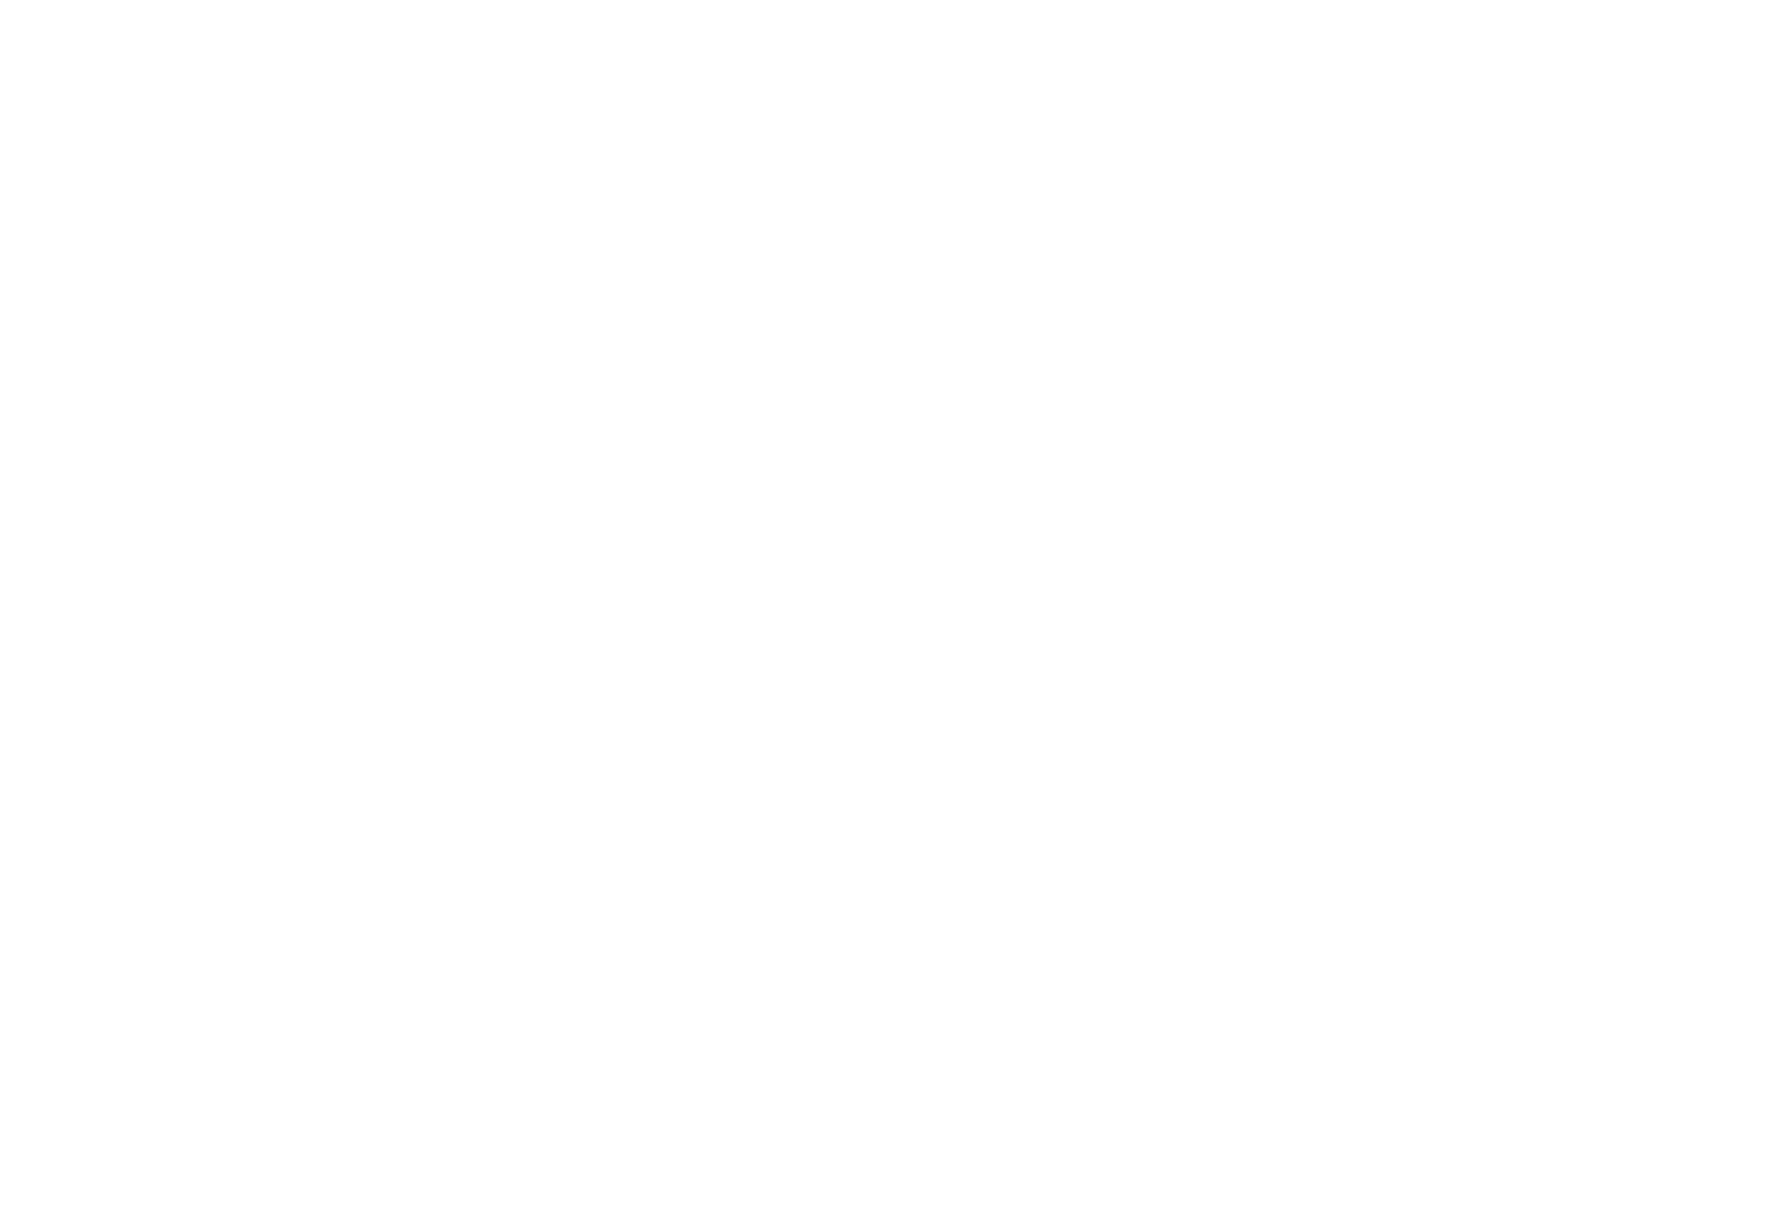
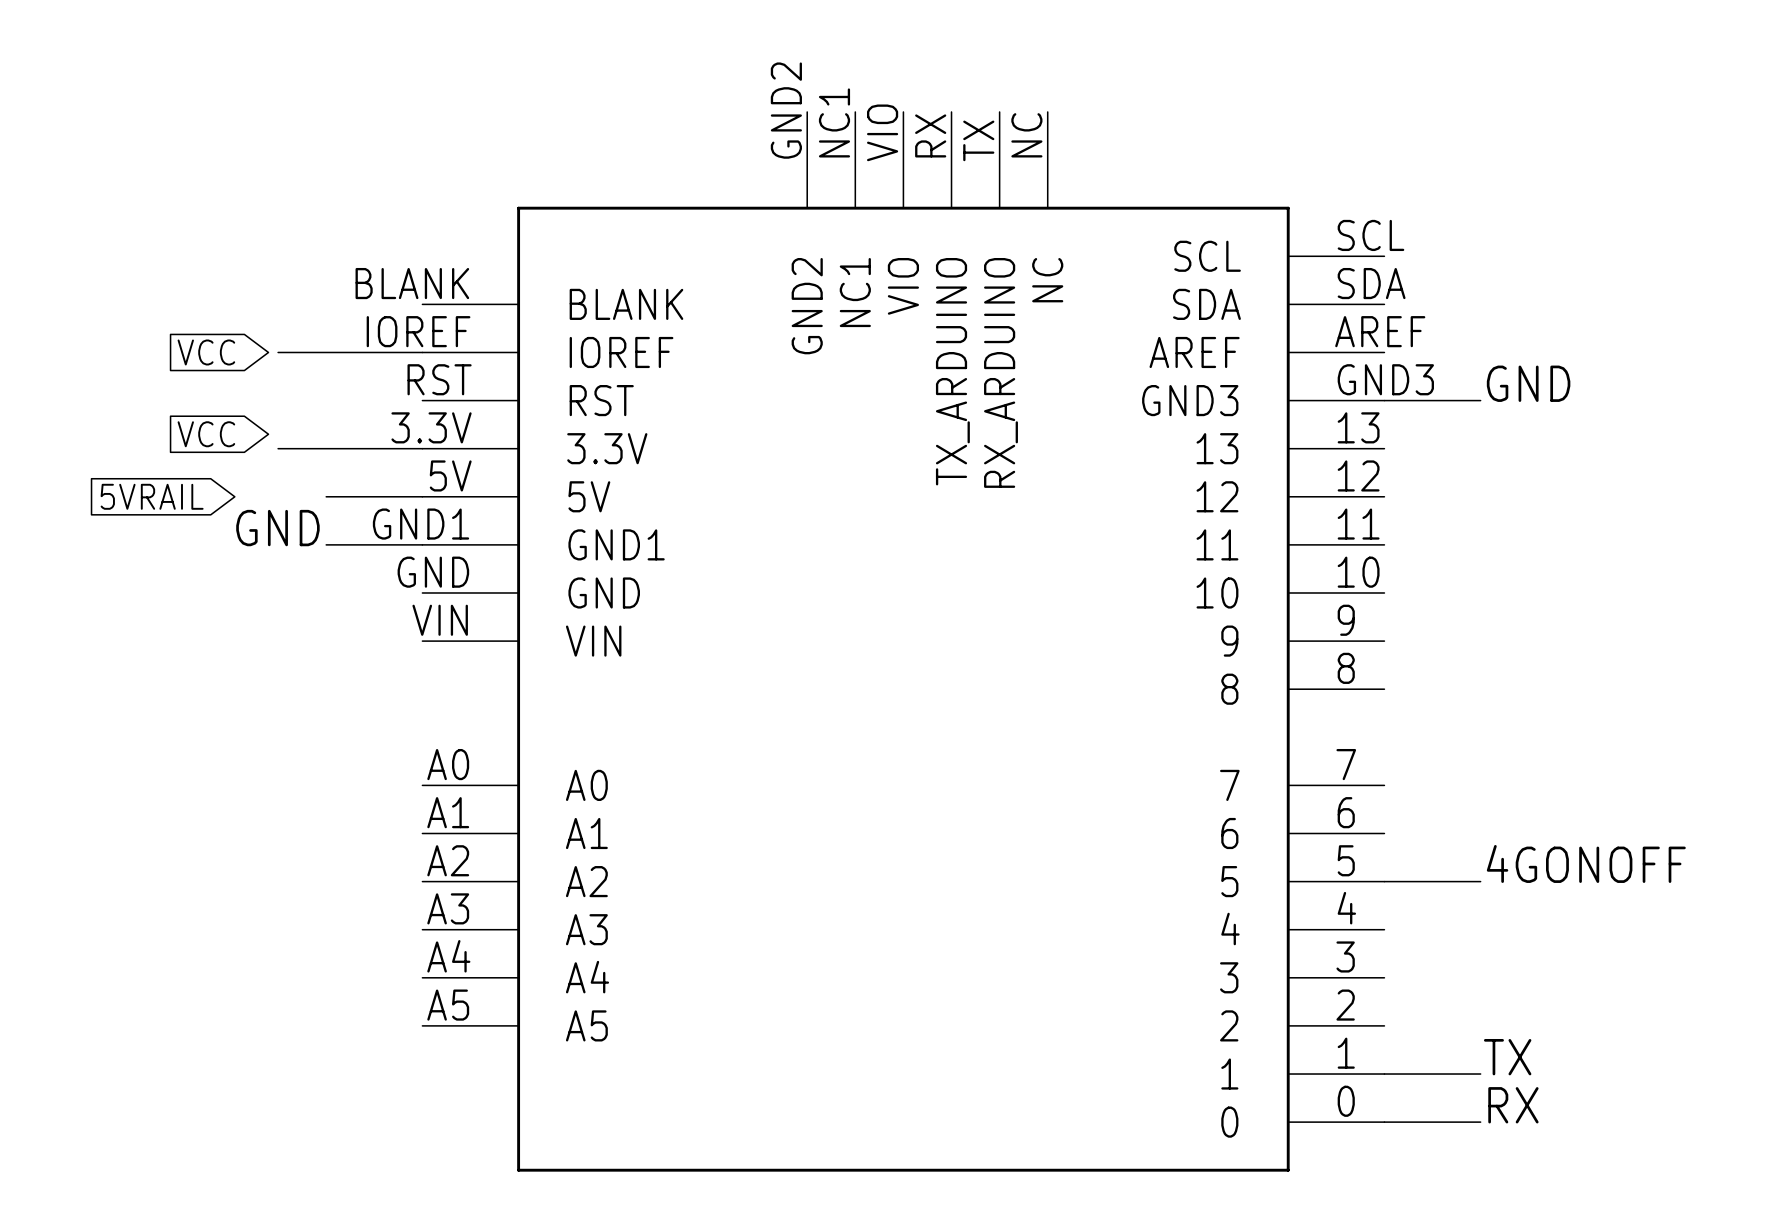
global label: none -> VCC (206, 352)
wire: none -> (278, 352) (422, 352)
label: none -> GND (1528, 383)
wire: none -> (1384, 400) (1480, 400)
global label: none -> VCC (206, 434)
wire: none -> (278, 448) (422, 448)
global label: none -> 5VRAIL (152, 496)
wire: none -> (326, 496) (422, 496)
label: none -> GND (277, 528)
wire: none -> (326, 544) (422, 544)
part: none -> (903, 641)
label: none -> 4GONOFF (1586, 863)
wire: none -> (1384, 881) (1480, 881)
label: none -> TX (1507, 1057)
wire: none -> (1384, 1074) (1480, 1074)
label: none -> RX (1513, 1105)
wire: none -> (1384, 1122) (1480, 1122)

